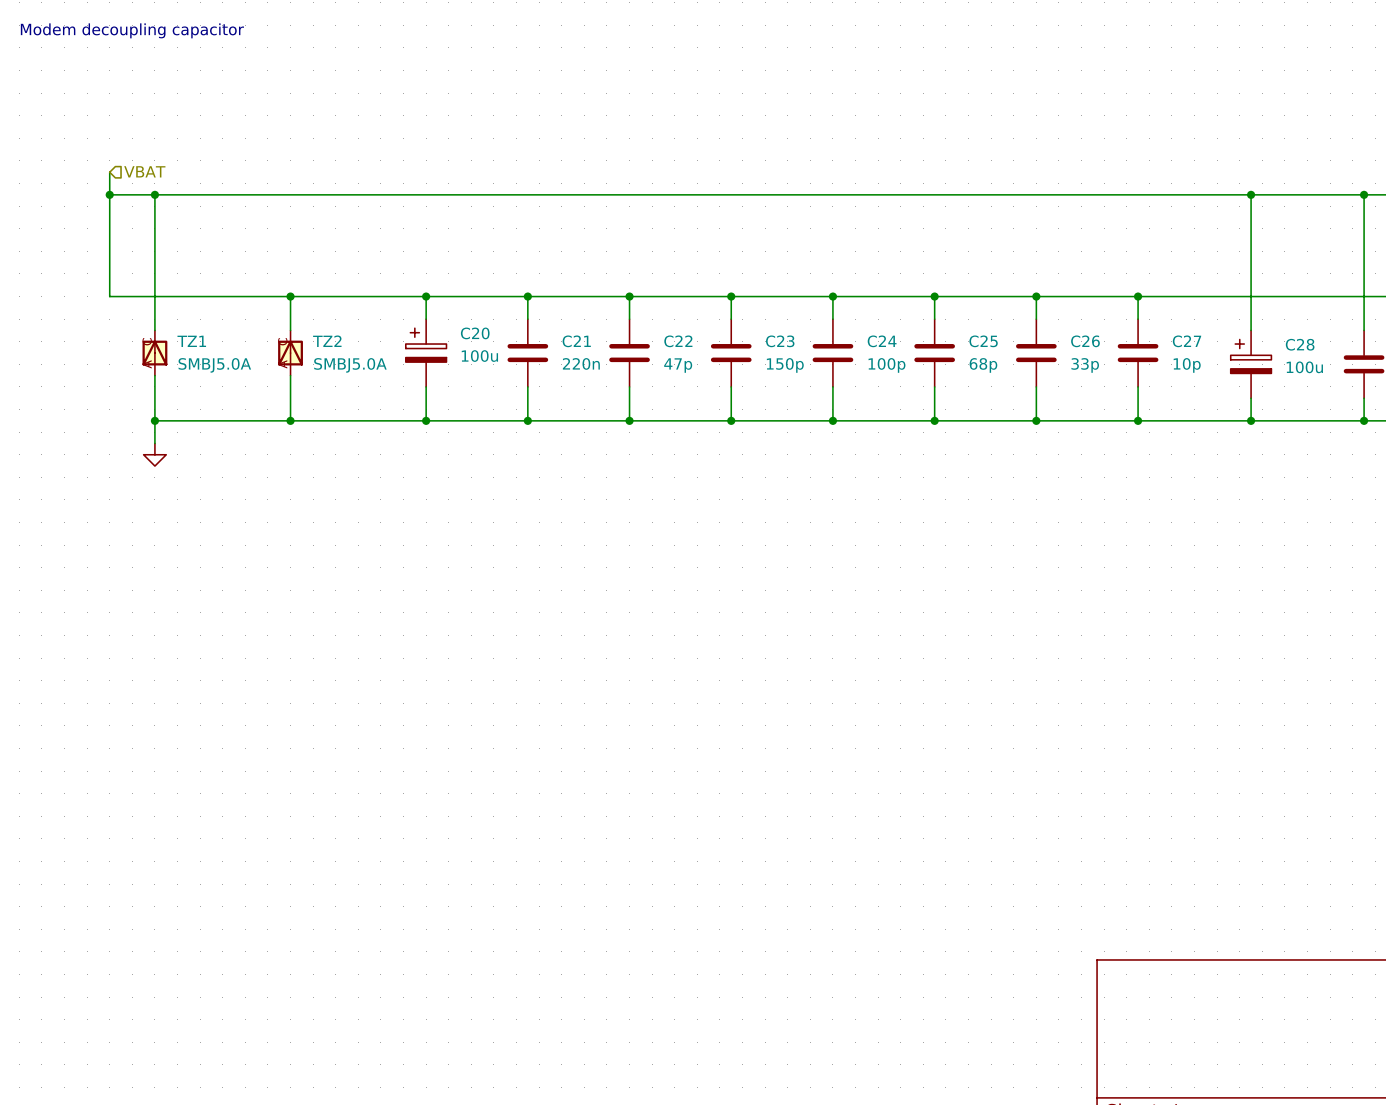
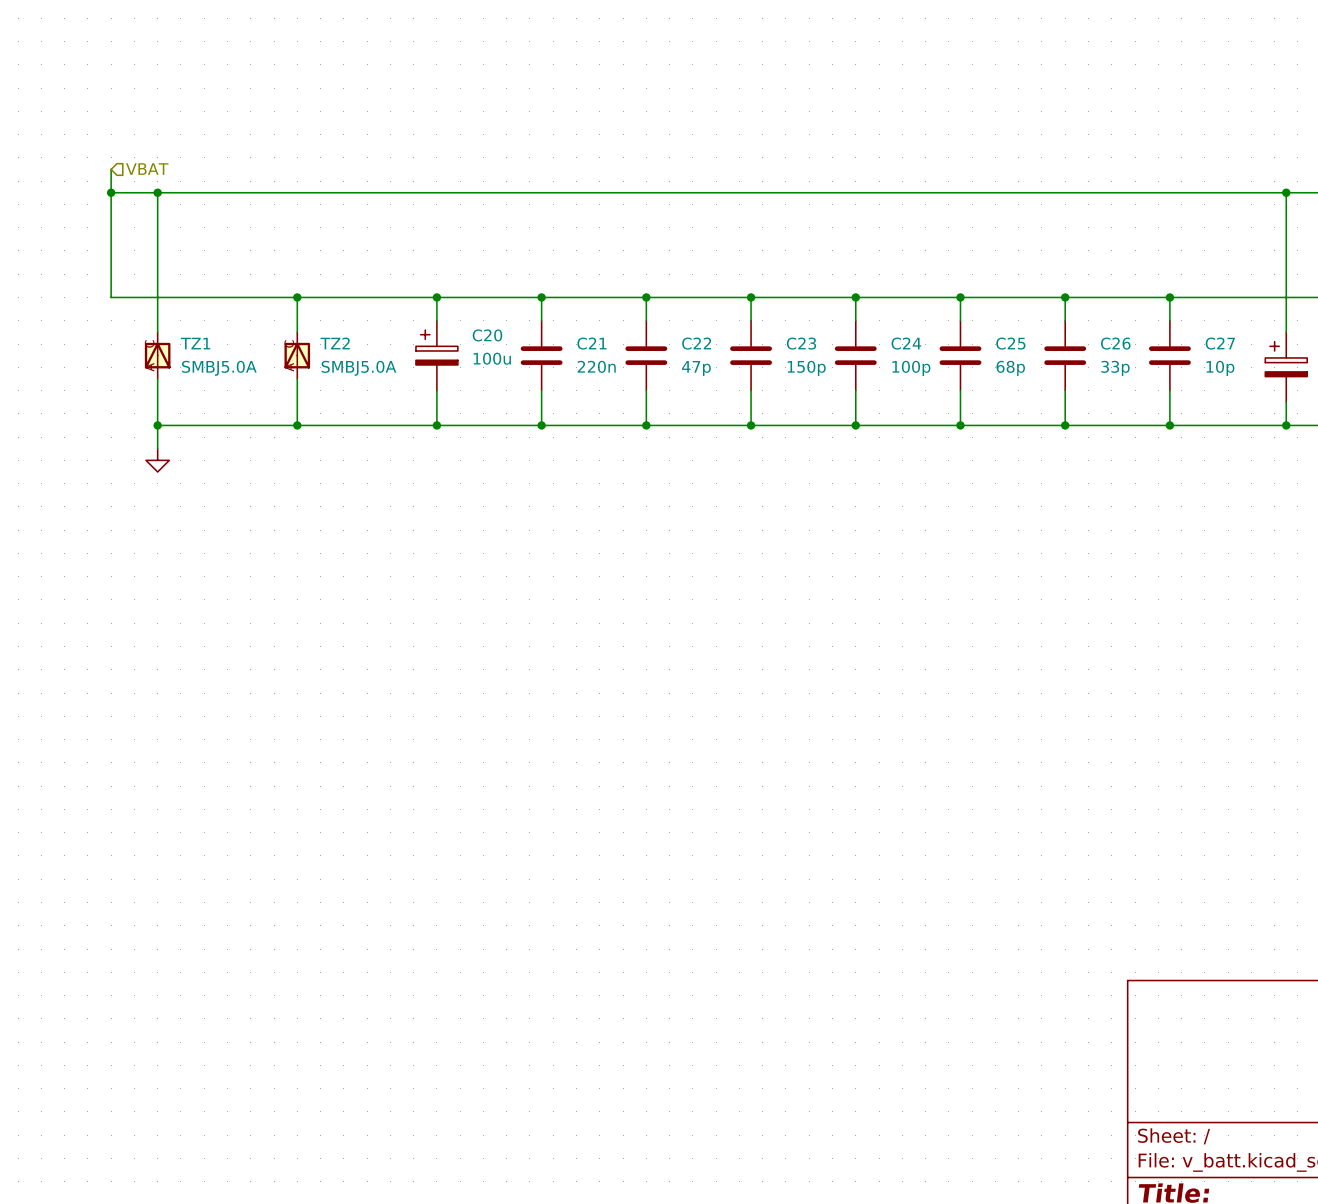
text: Modem decoupling capacitor (132, 30) -> none

